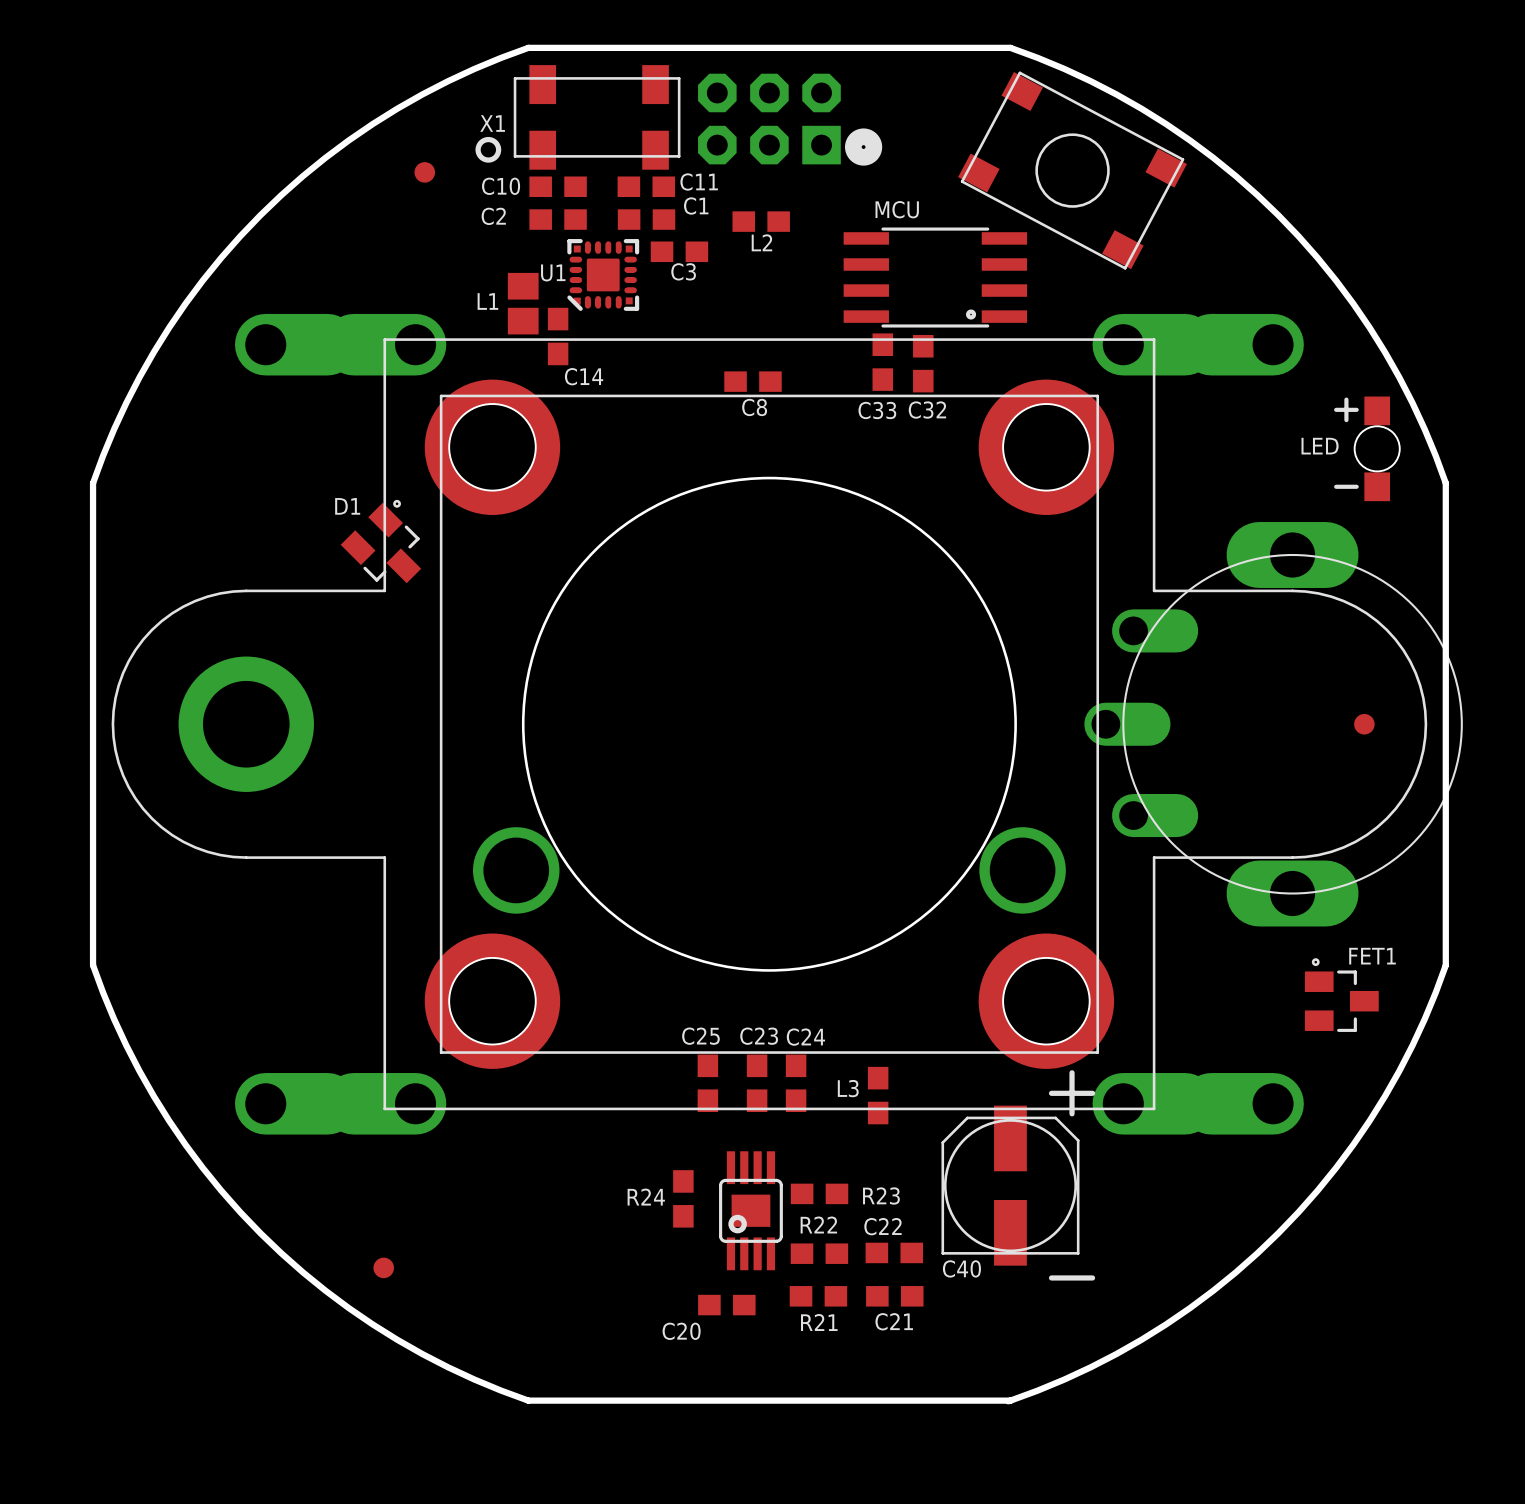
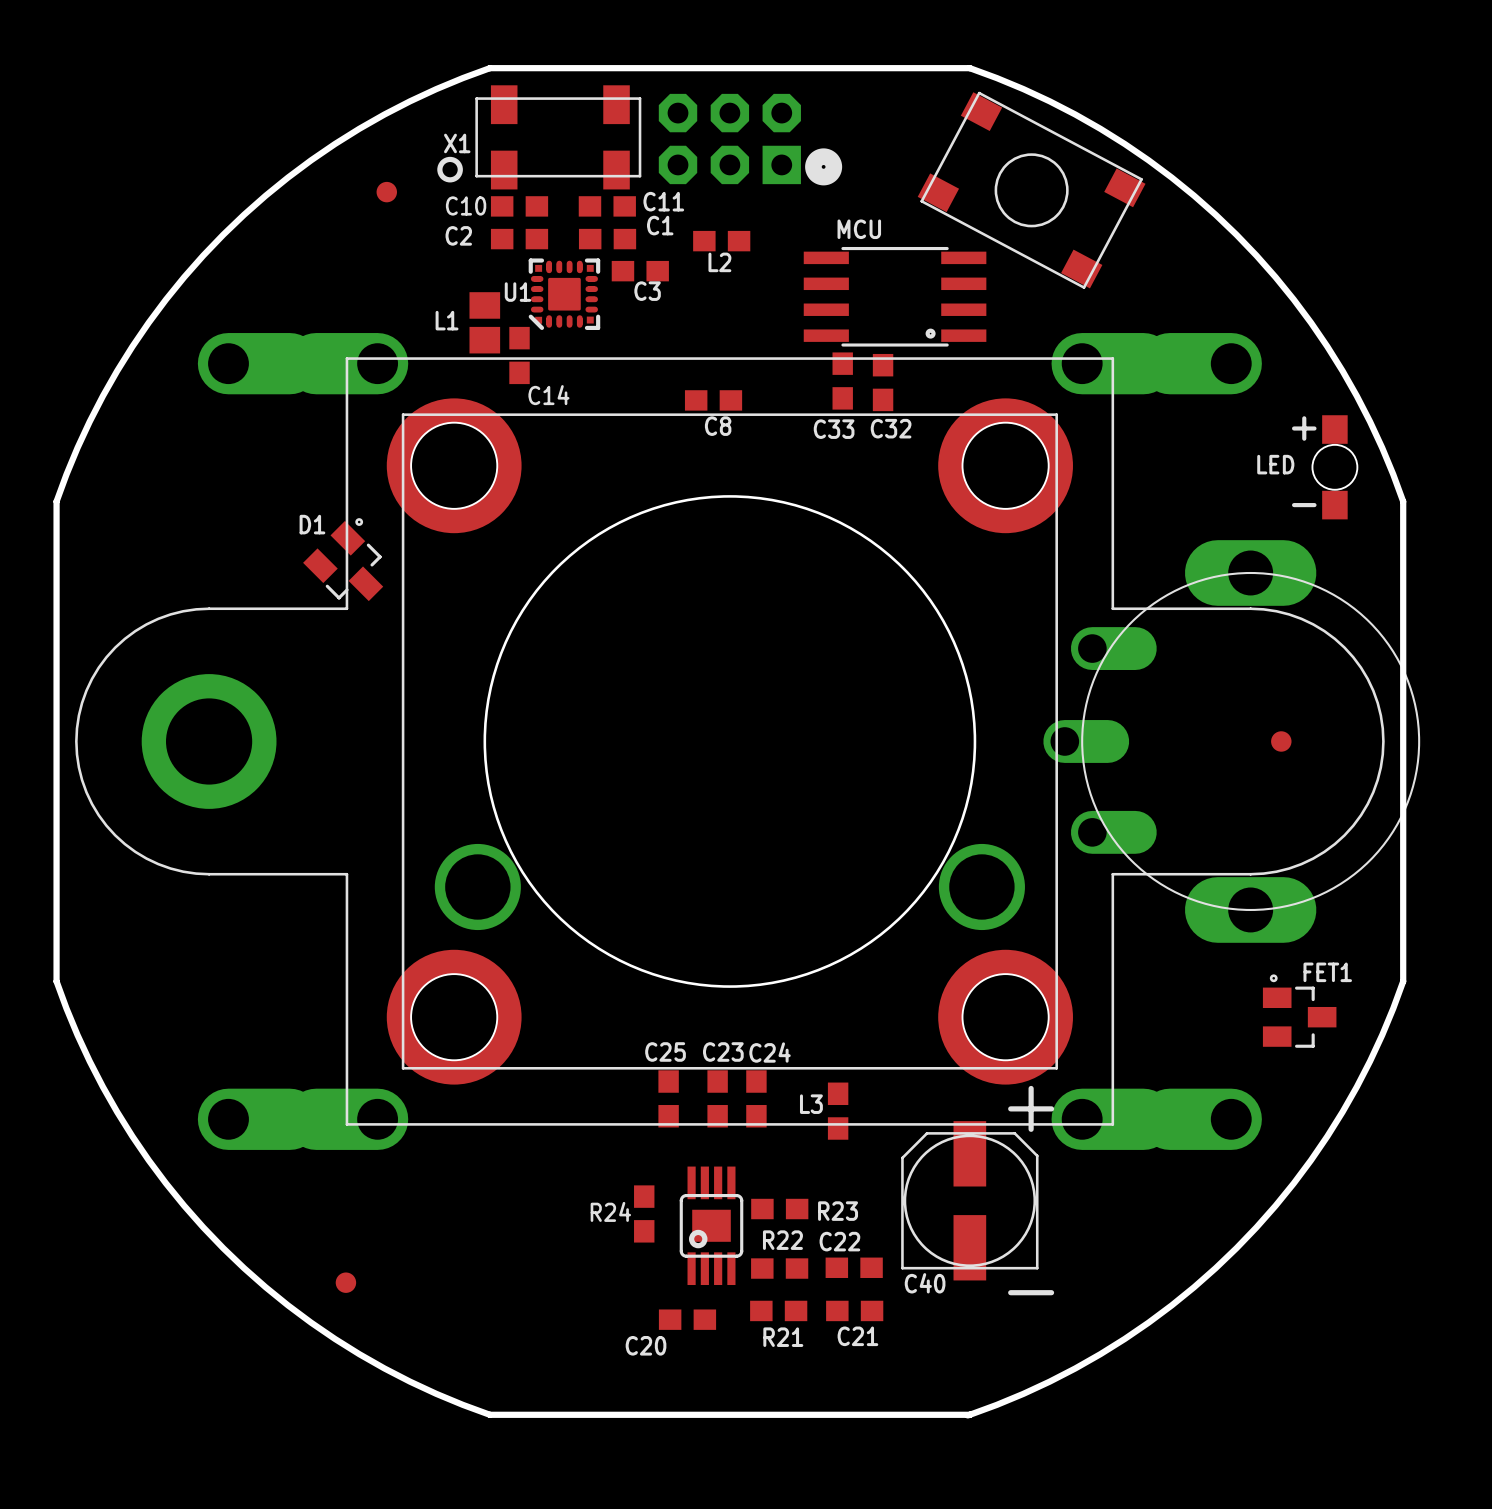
part position: (1364, 724) -> (1281, 741)

